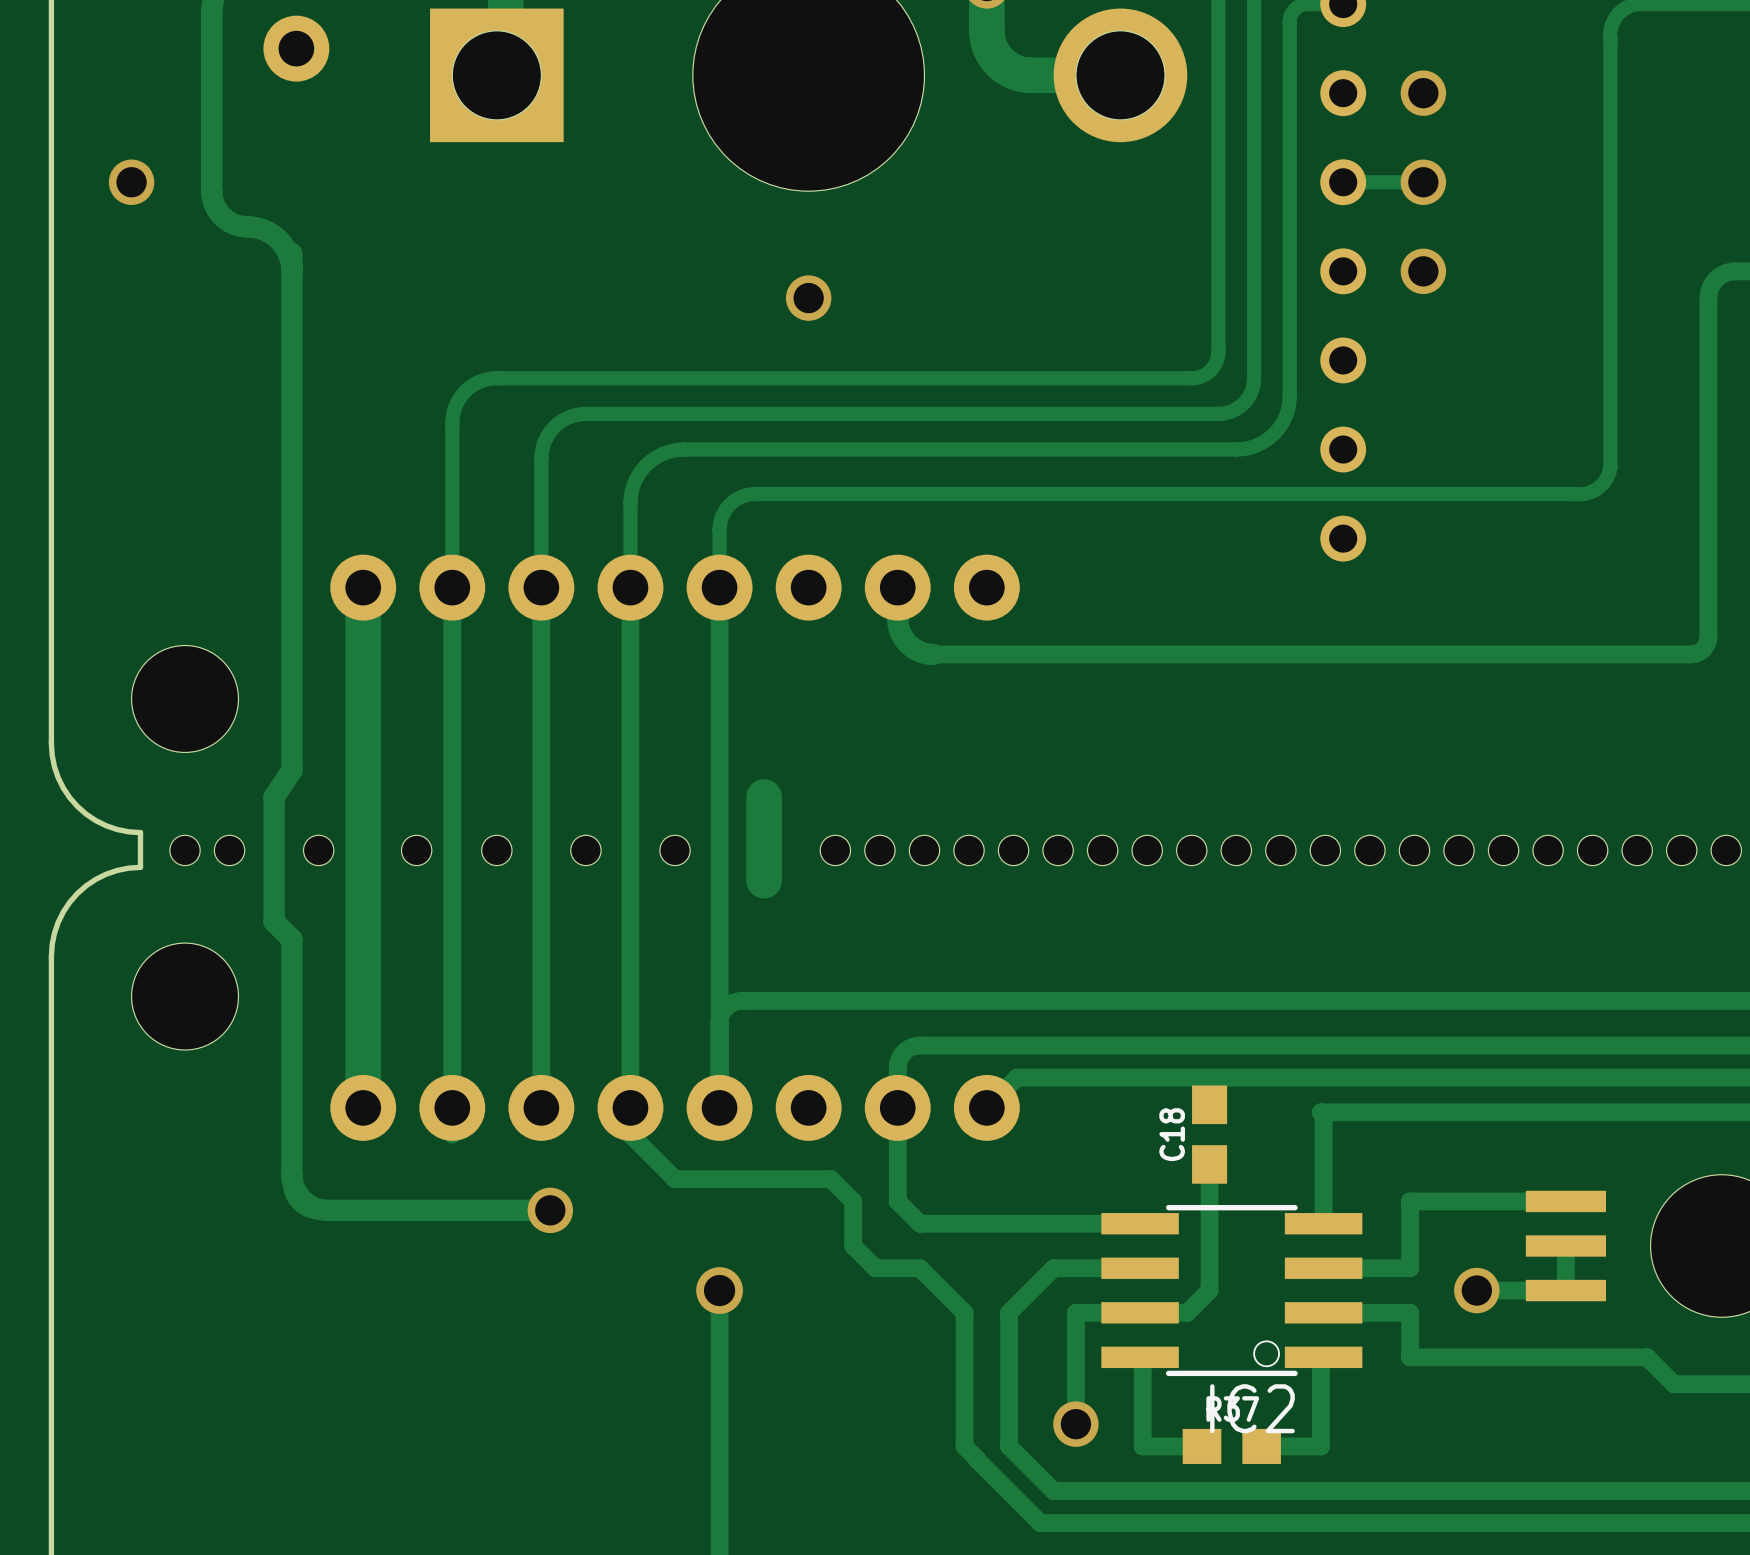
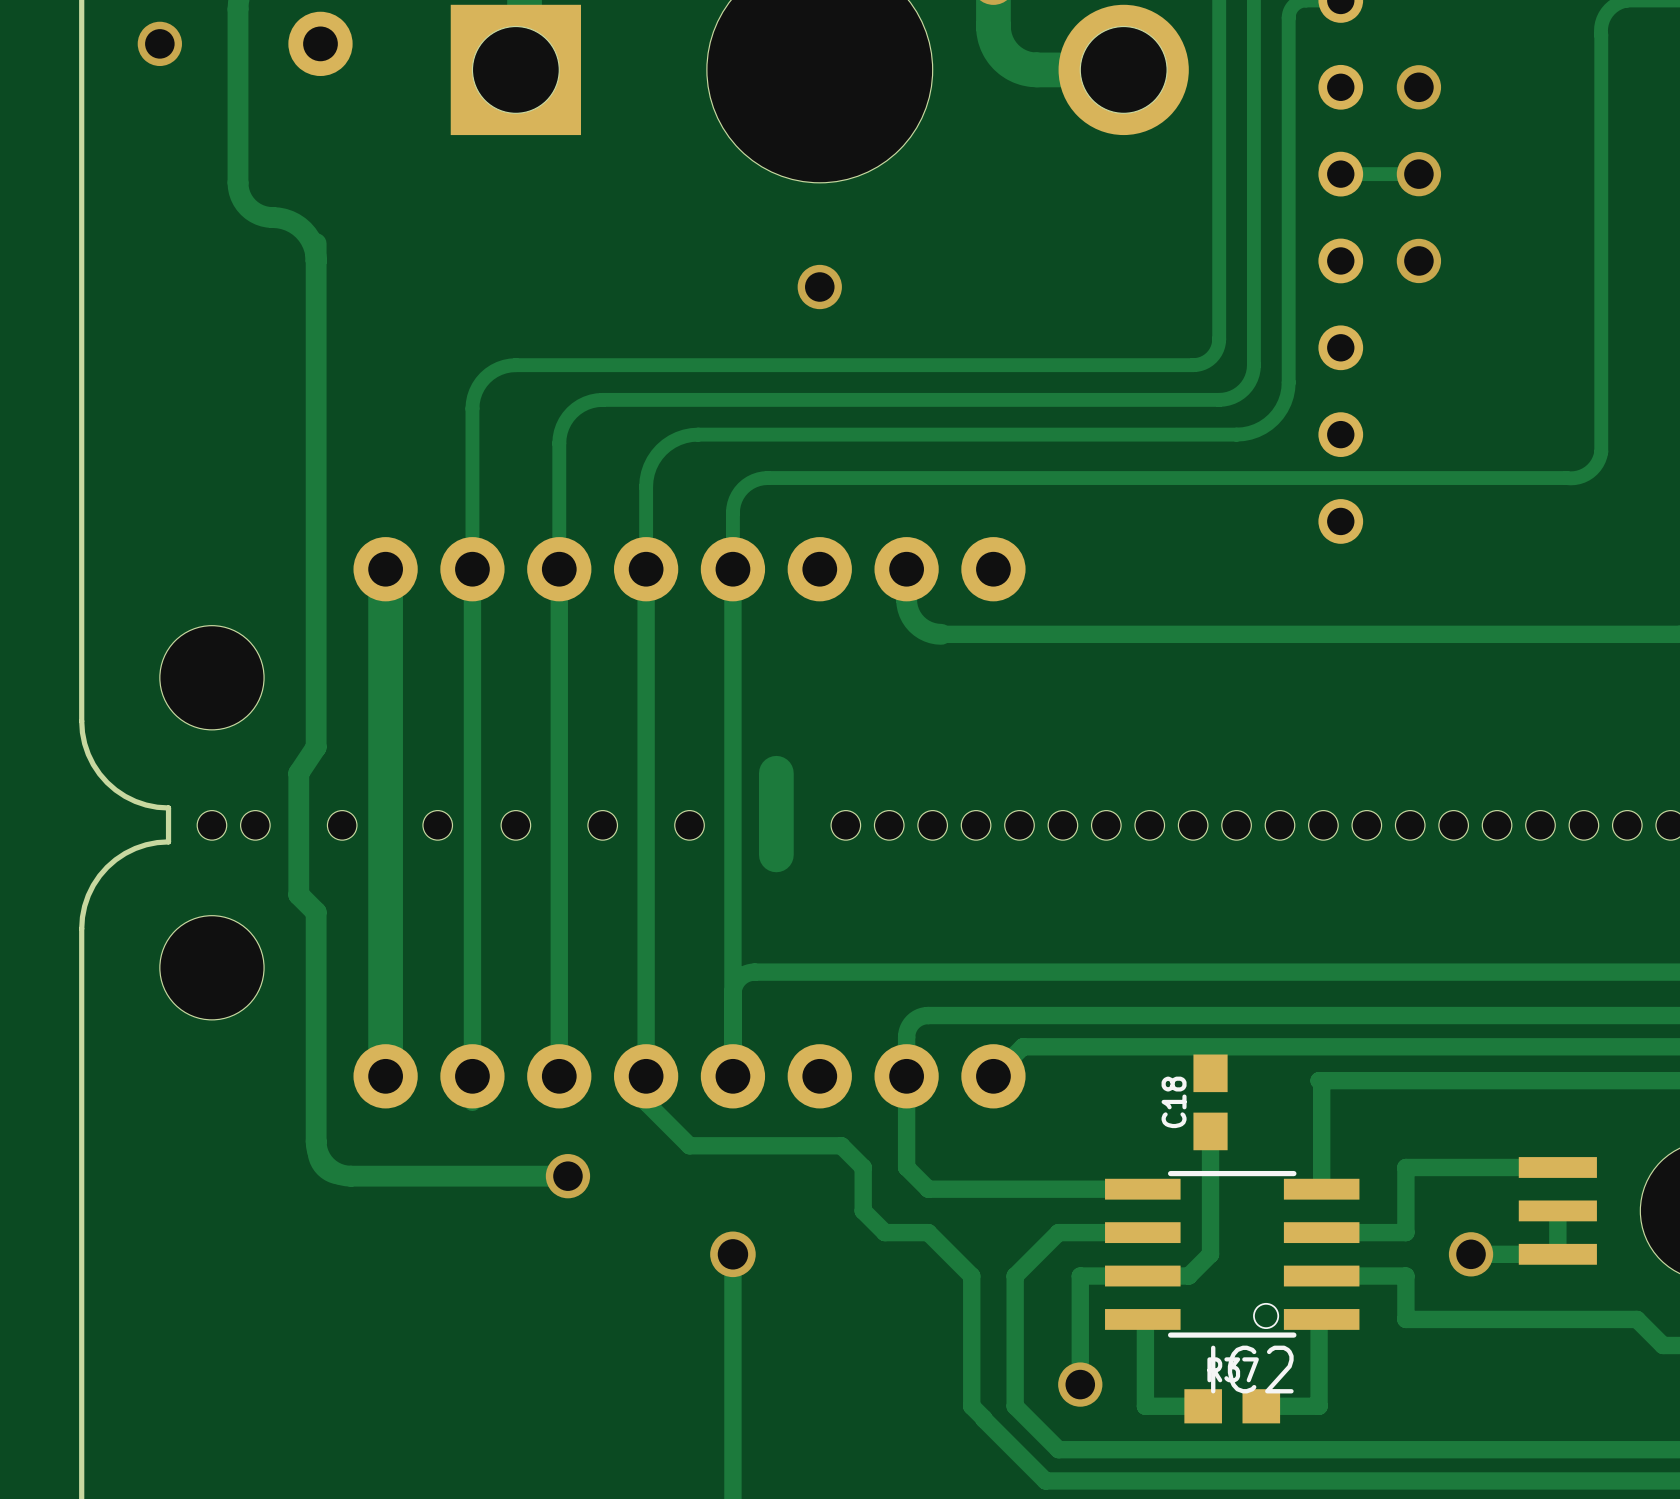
via position: (131, 182) -> (159, 43)

